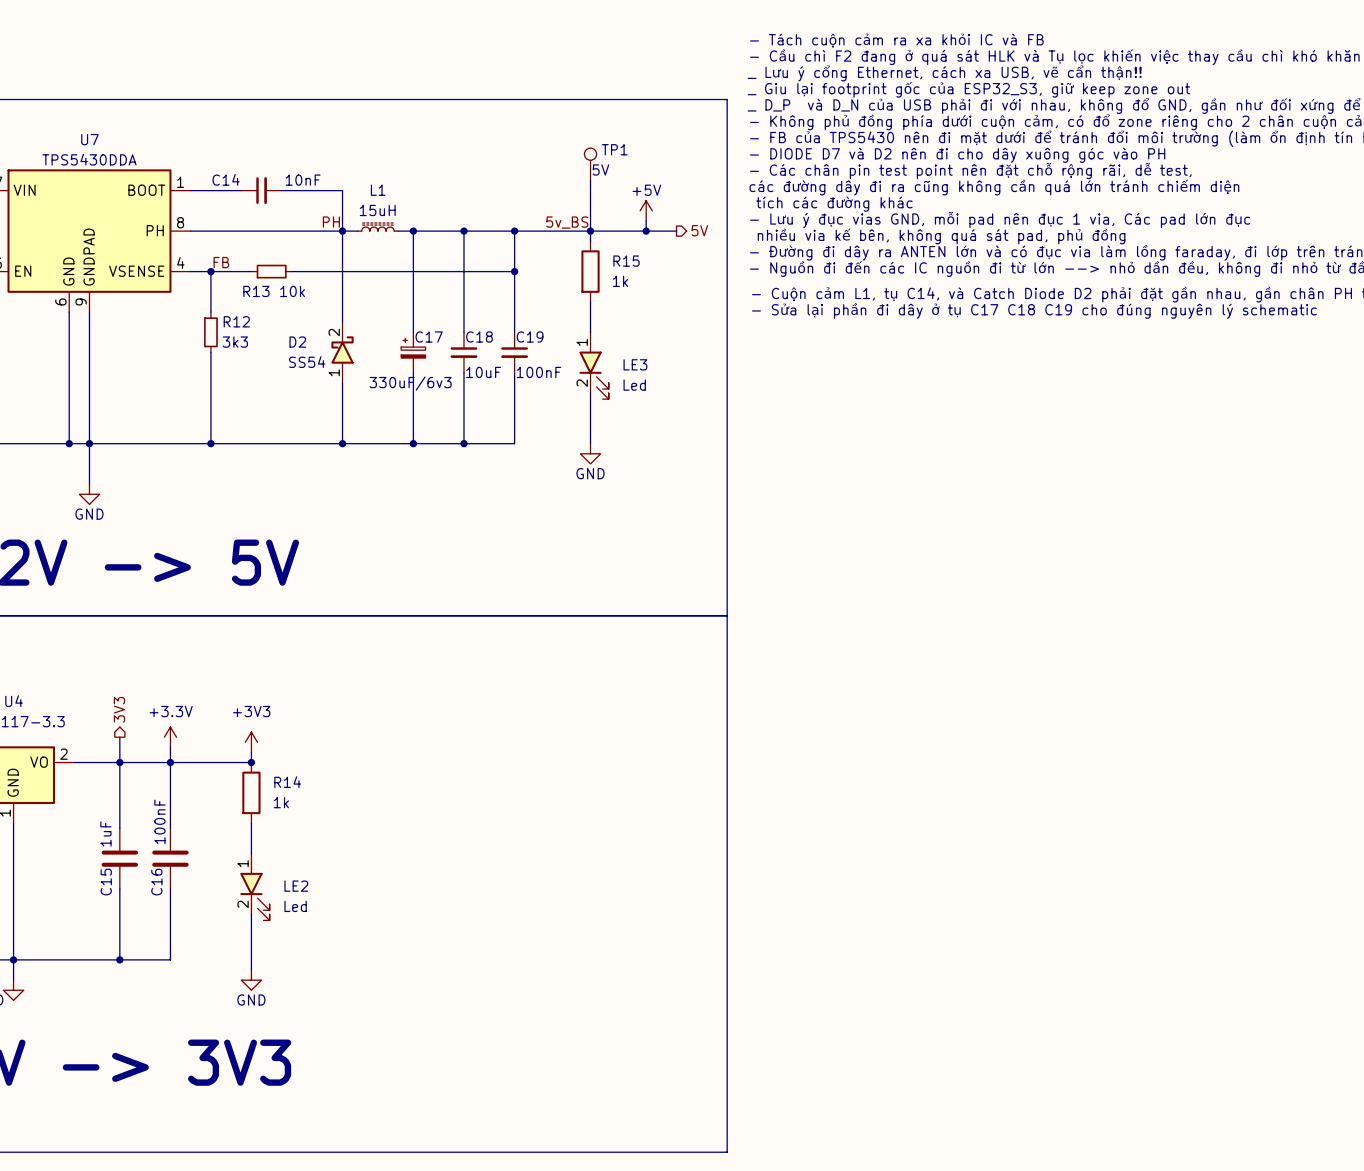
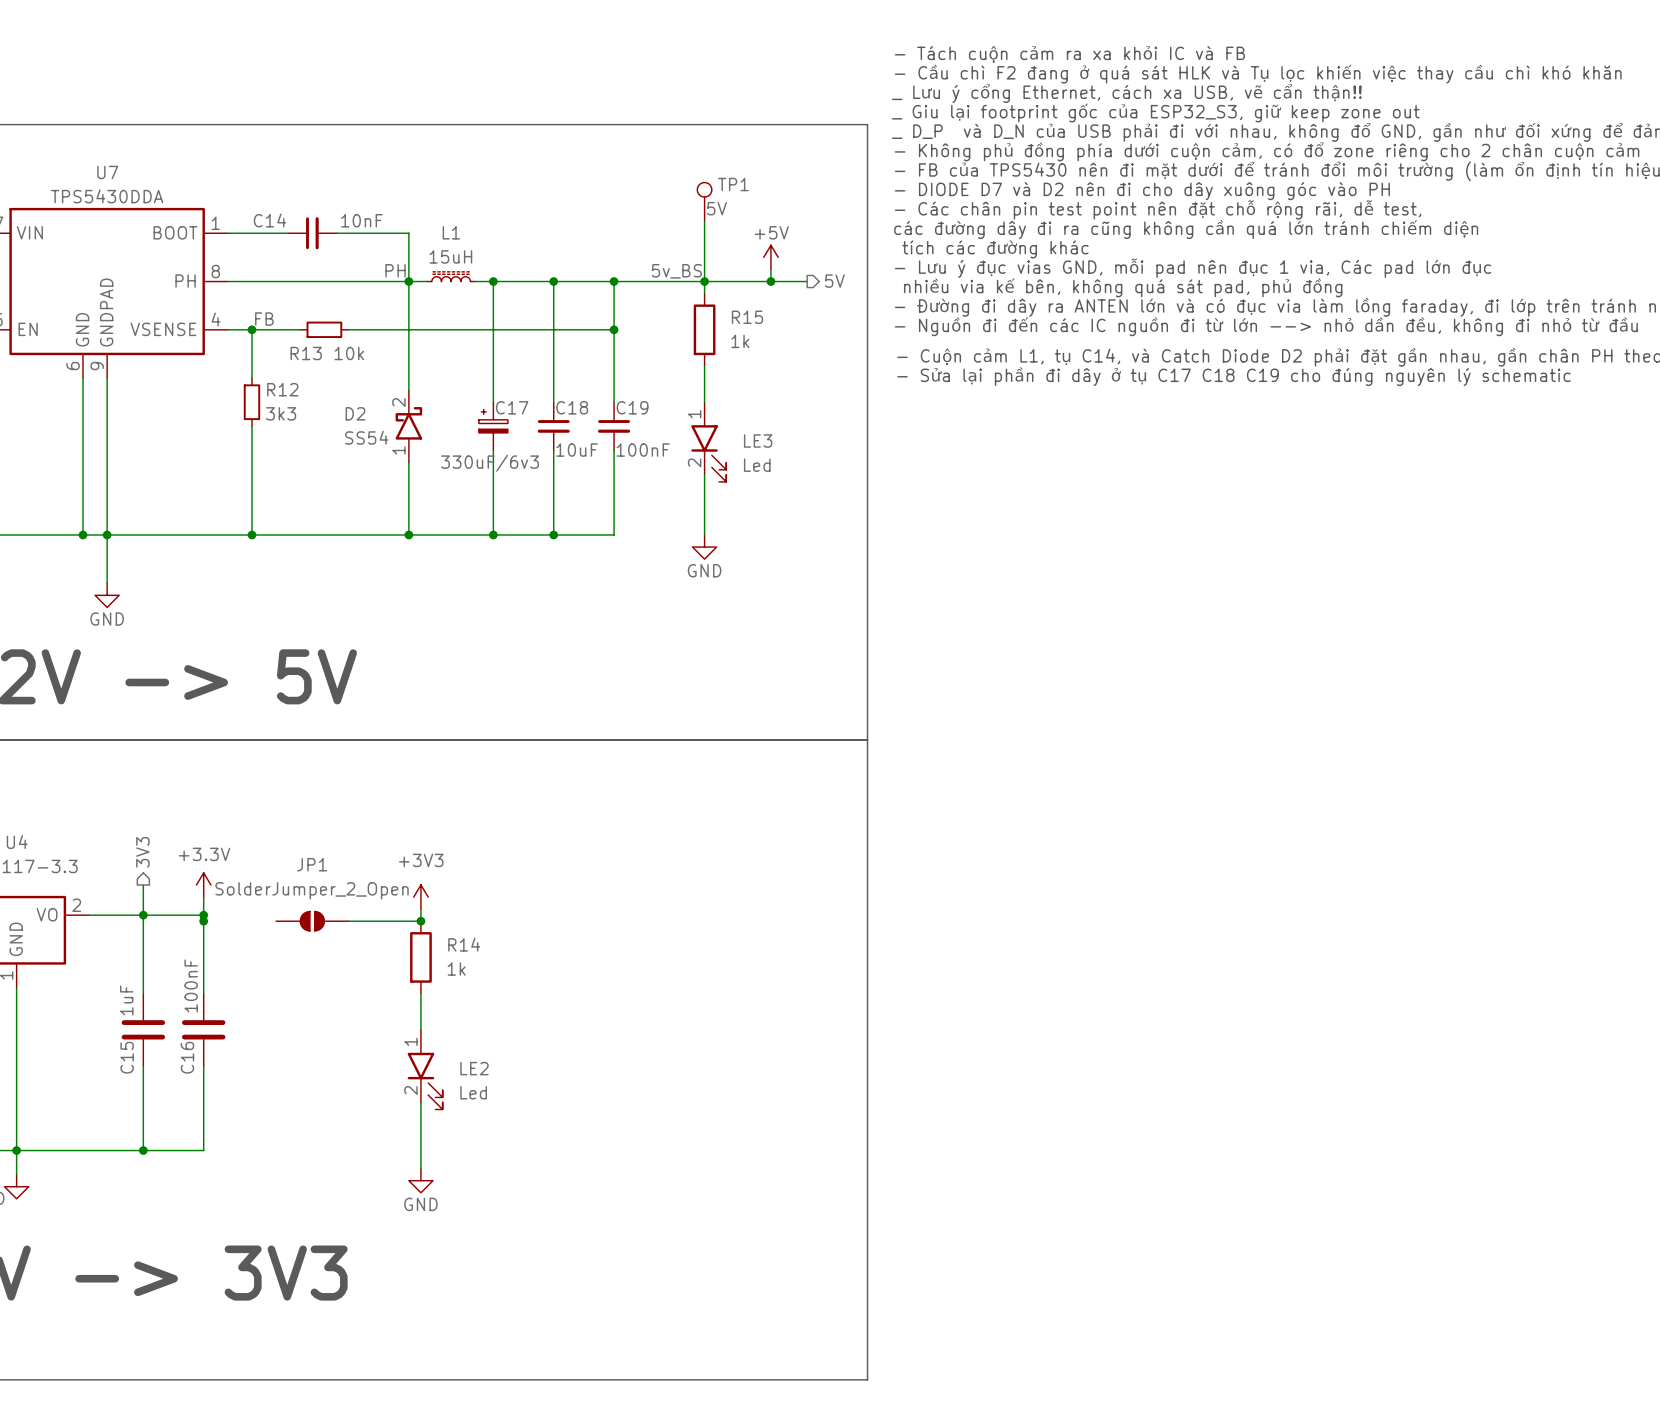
power symbol position: +3V3 (251, 742) -> +3V3 (420, 897)
wire: (251, 752) (251, 762) (170, 762) -> none
wire: none -> (420, 909) (420, 921) (348, 921)
junction: (251, 762) -> none
junction: none -> (203, 921)
JP1: none -> SolderJumper_2_Open (312, 921)
junction: none -> (420, 921)
R14 position: (251, 792) -> (420, 957)
wire: (251, 823) (251, 853) -> (420, 993) (420, 1029)
LE2 position: (254, 887) -> (425, 1069)
wire: (251, 914) (251, 970) -> (420, 1102) (420, 1168)
power symbol position: GND (251, 980) -> GND (420, 1180)

